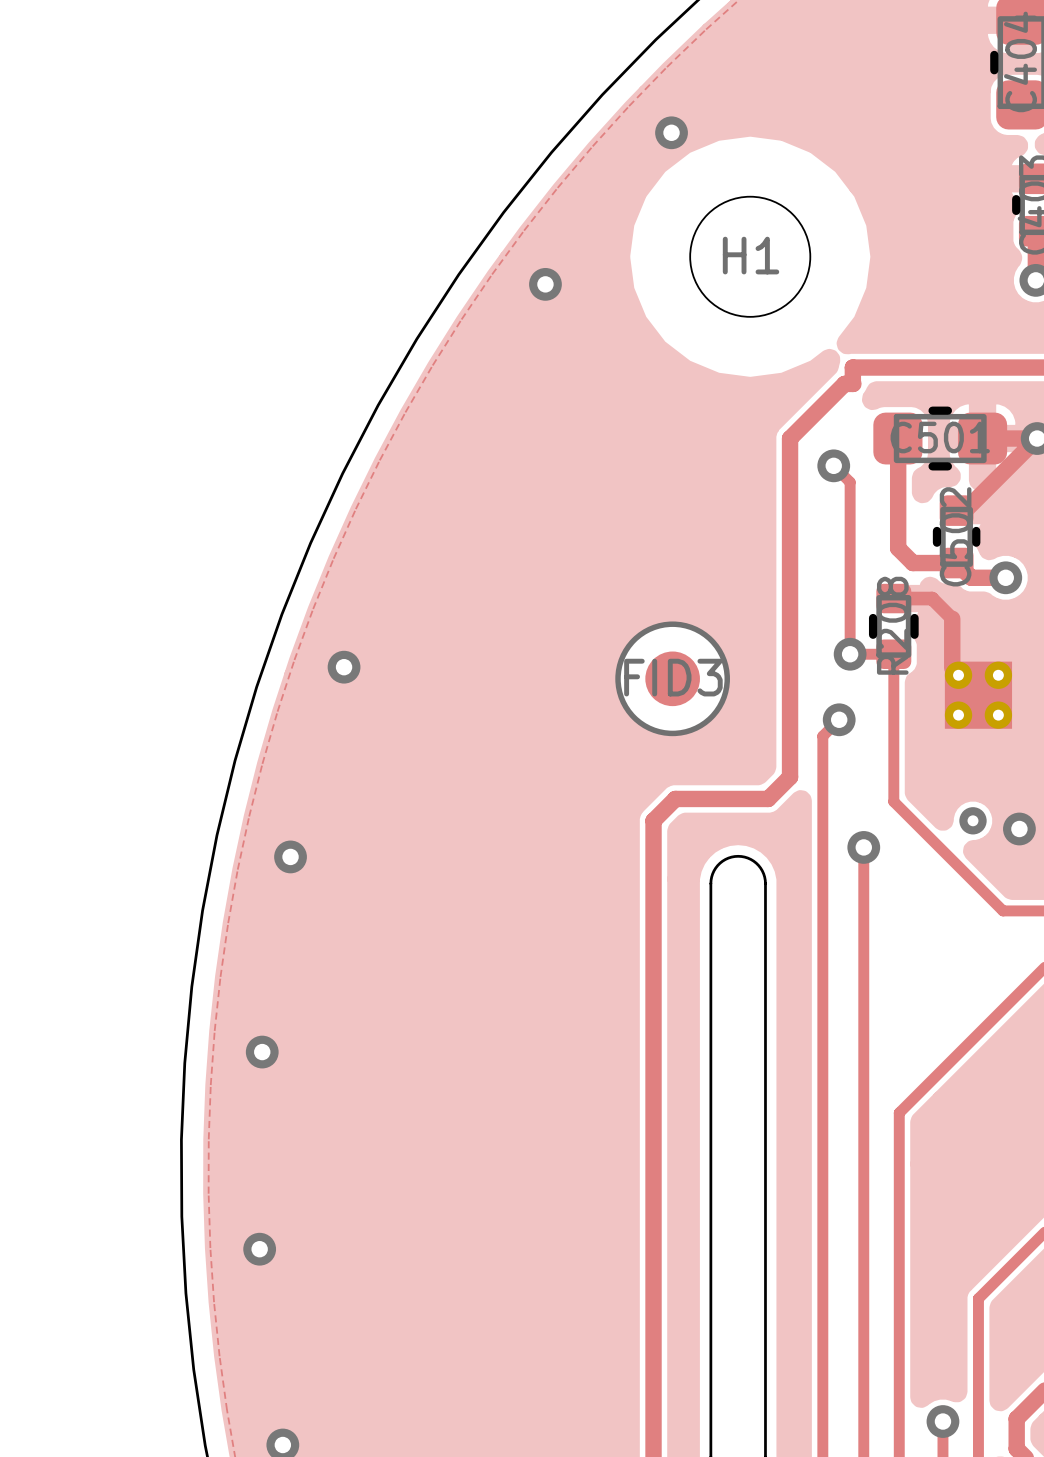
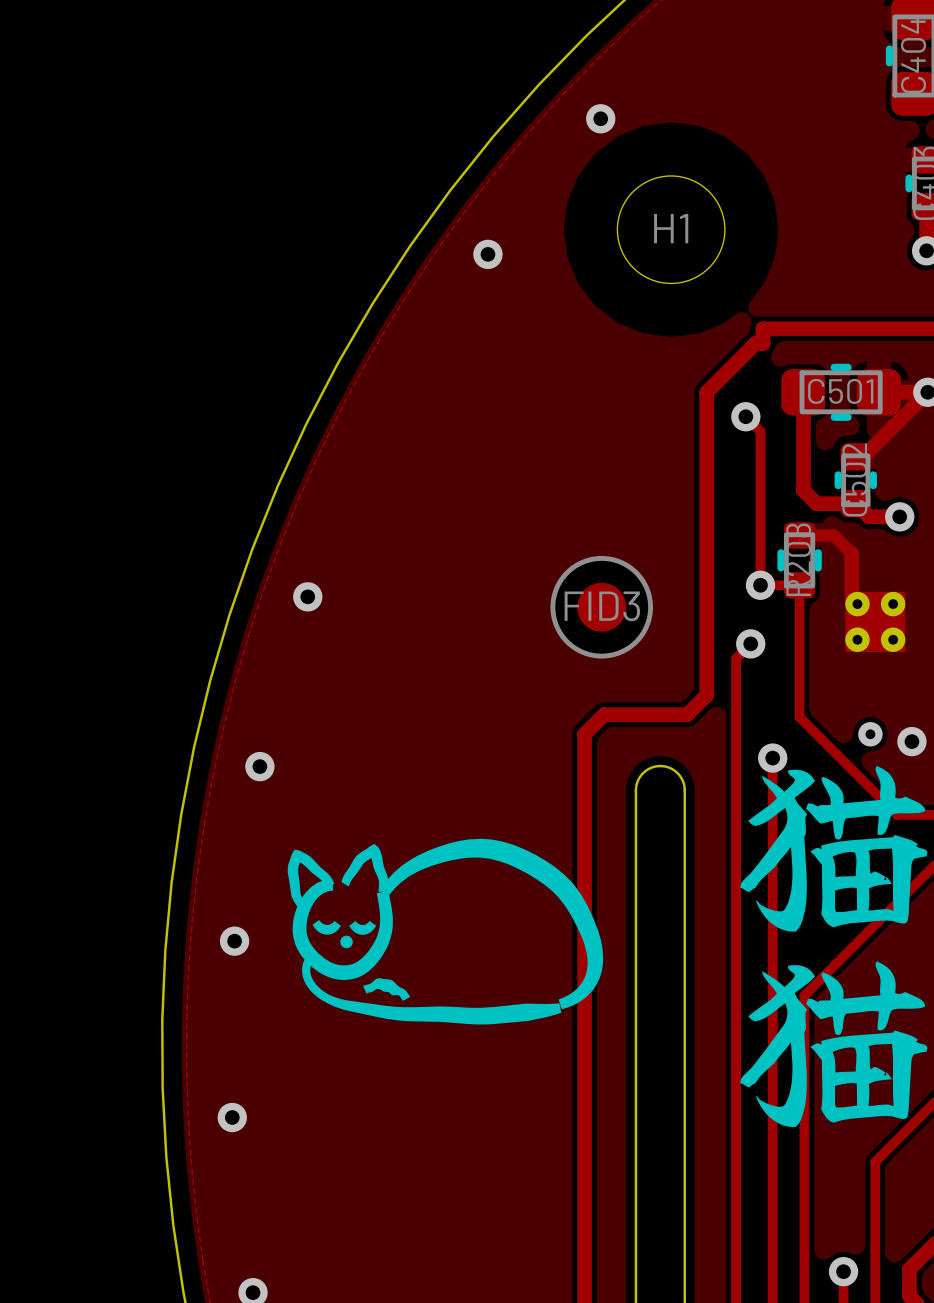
drawing: none -> [740, 765, 928, 1128]
drawing: none -> [287, 838, 604, 1025]

